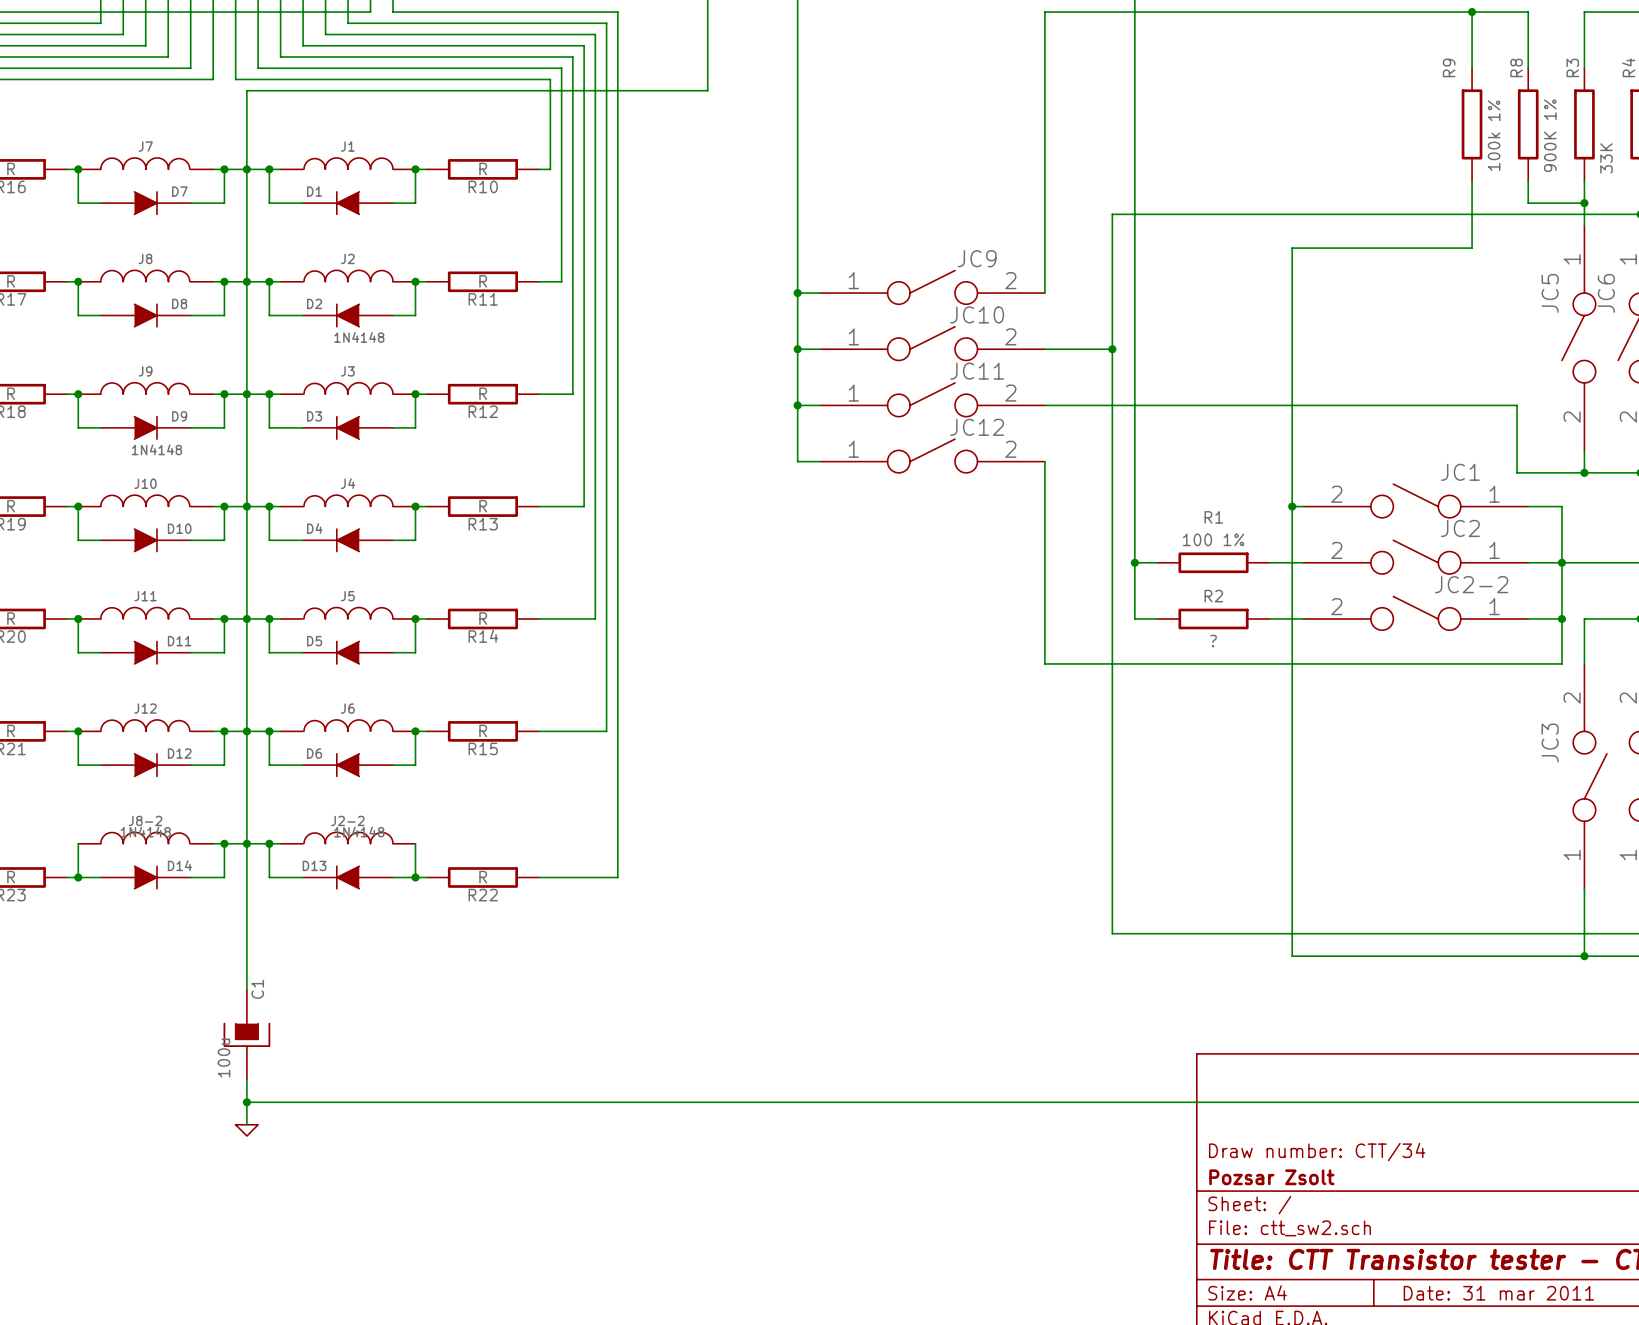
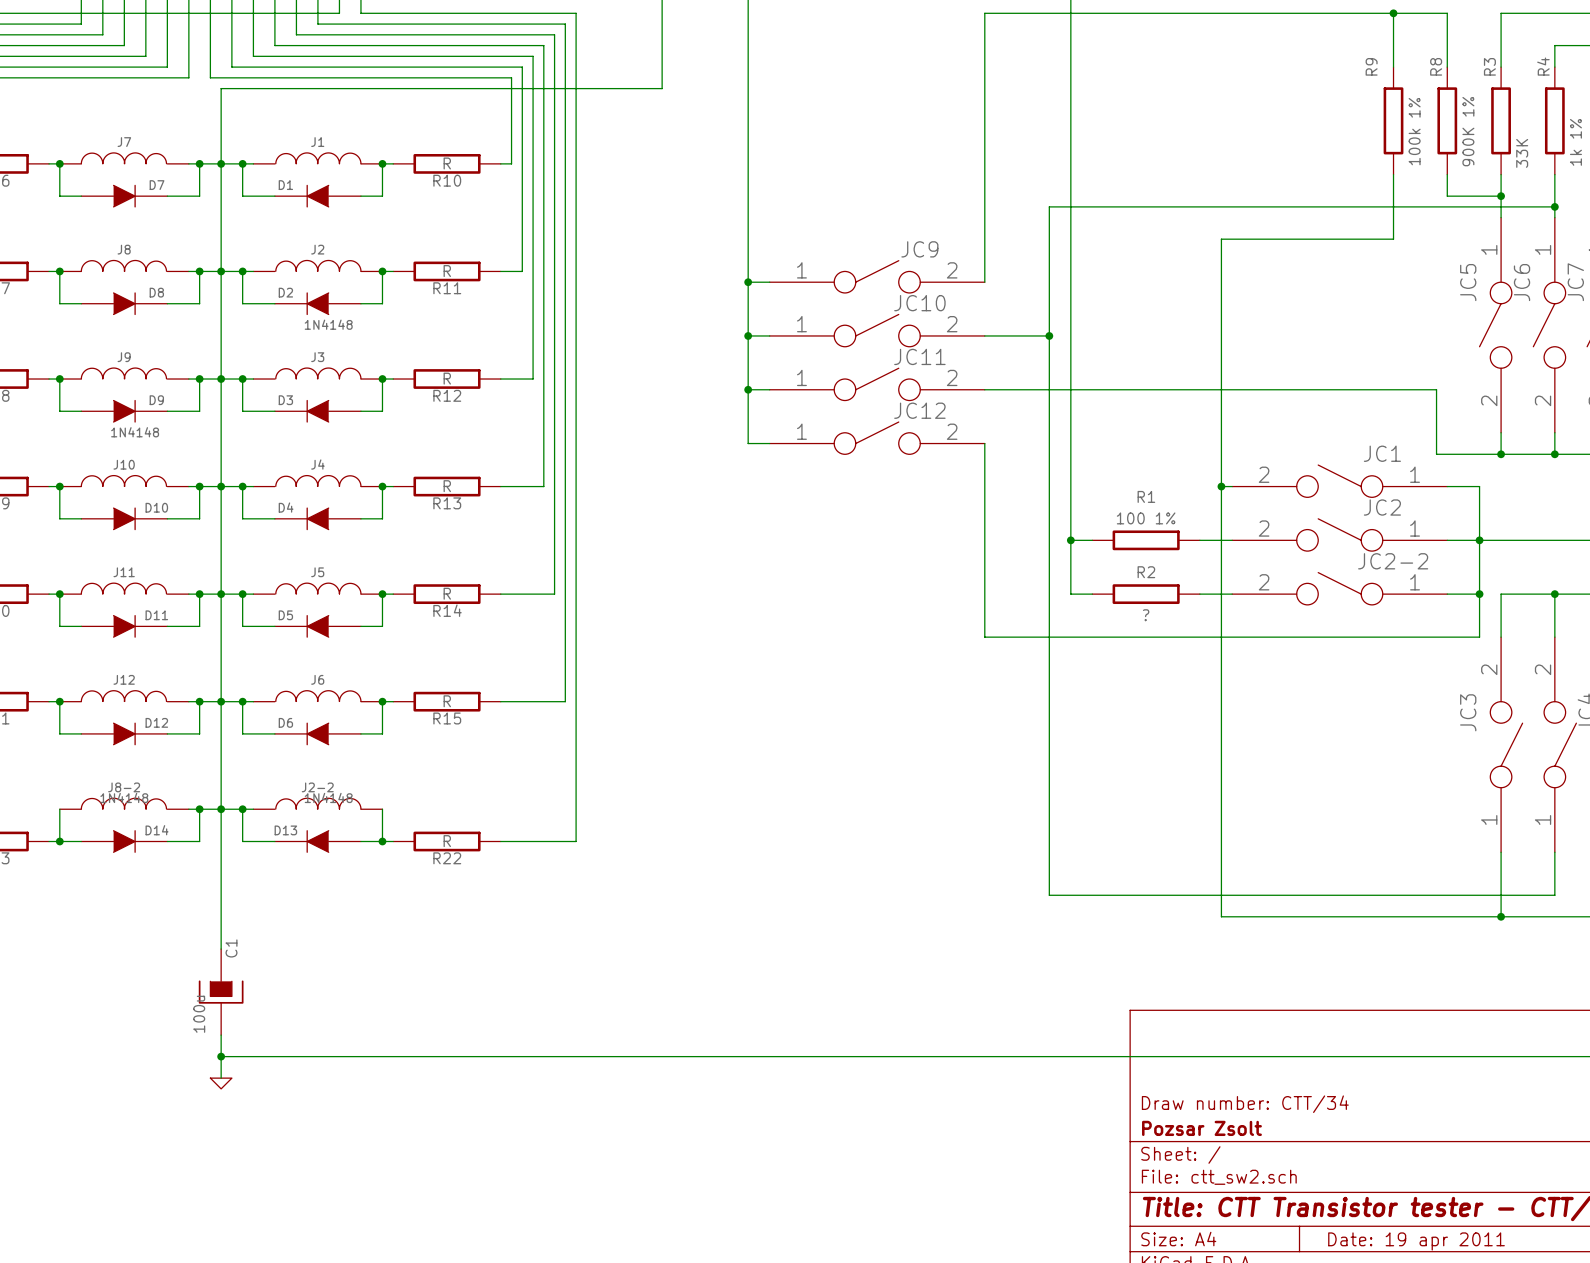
title block: Date: 31 mar 2011 (1498, 1293) -> Date: 19 apr 2011 (1416, 1241)

